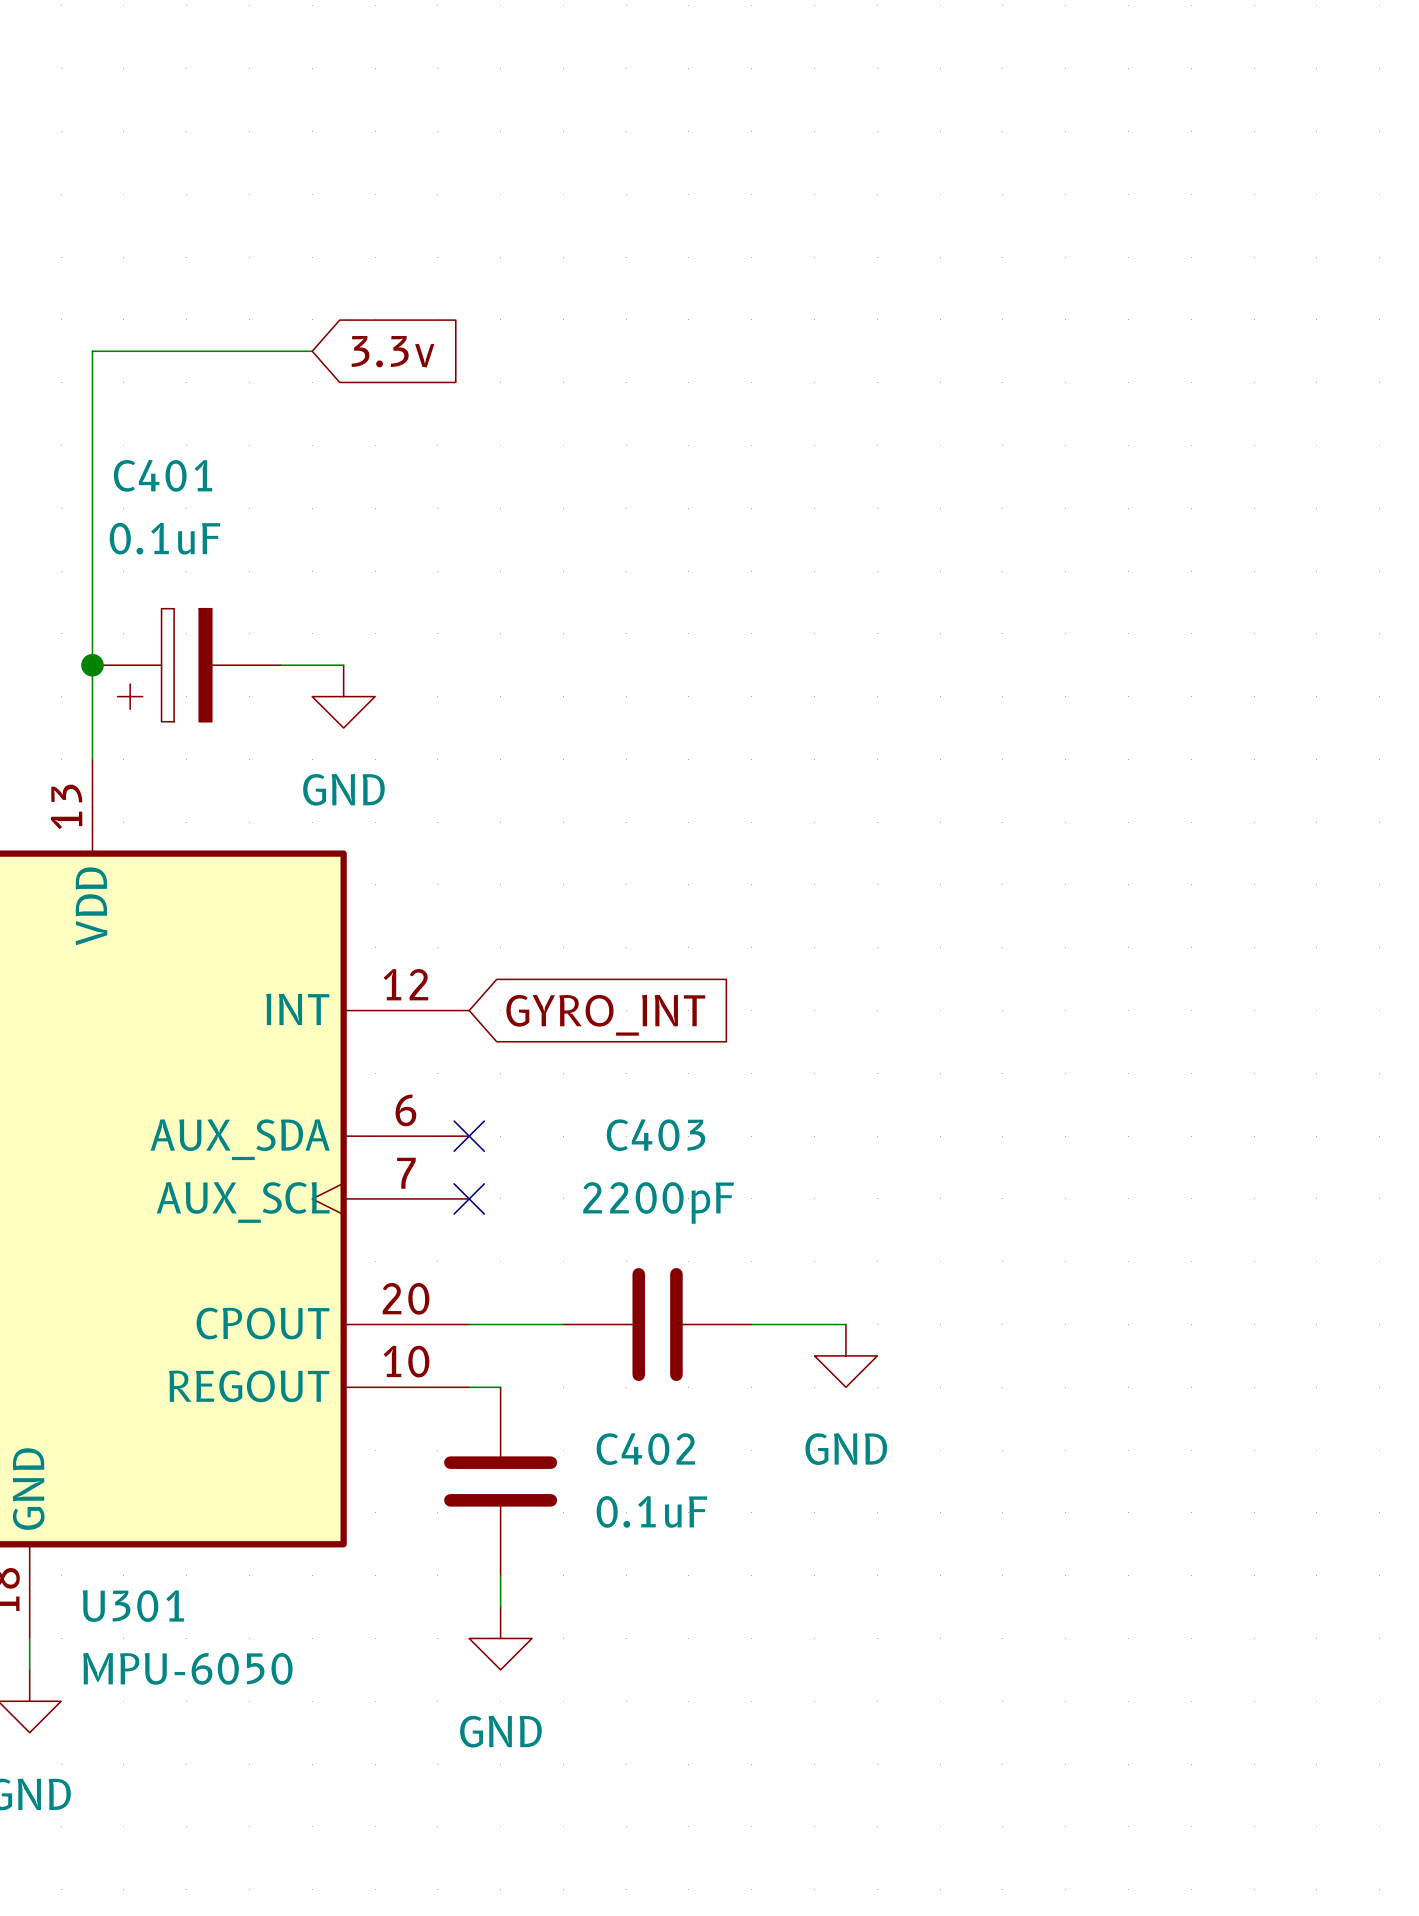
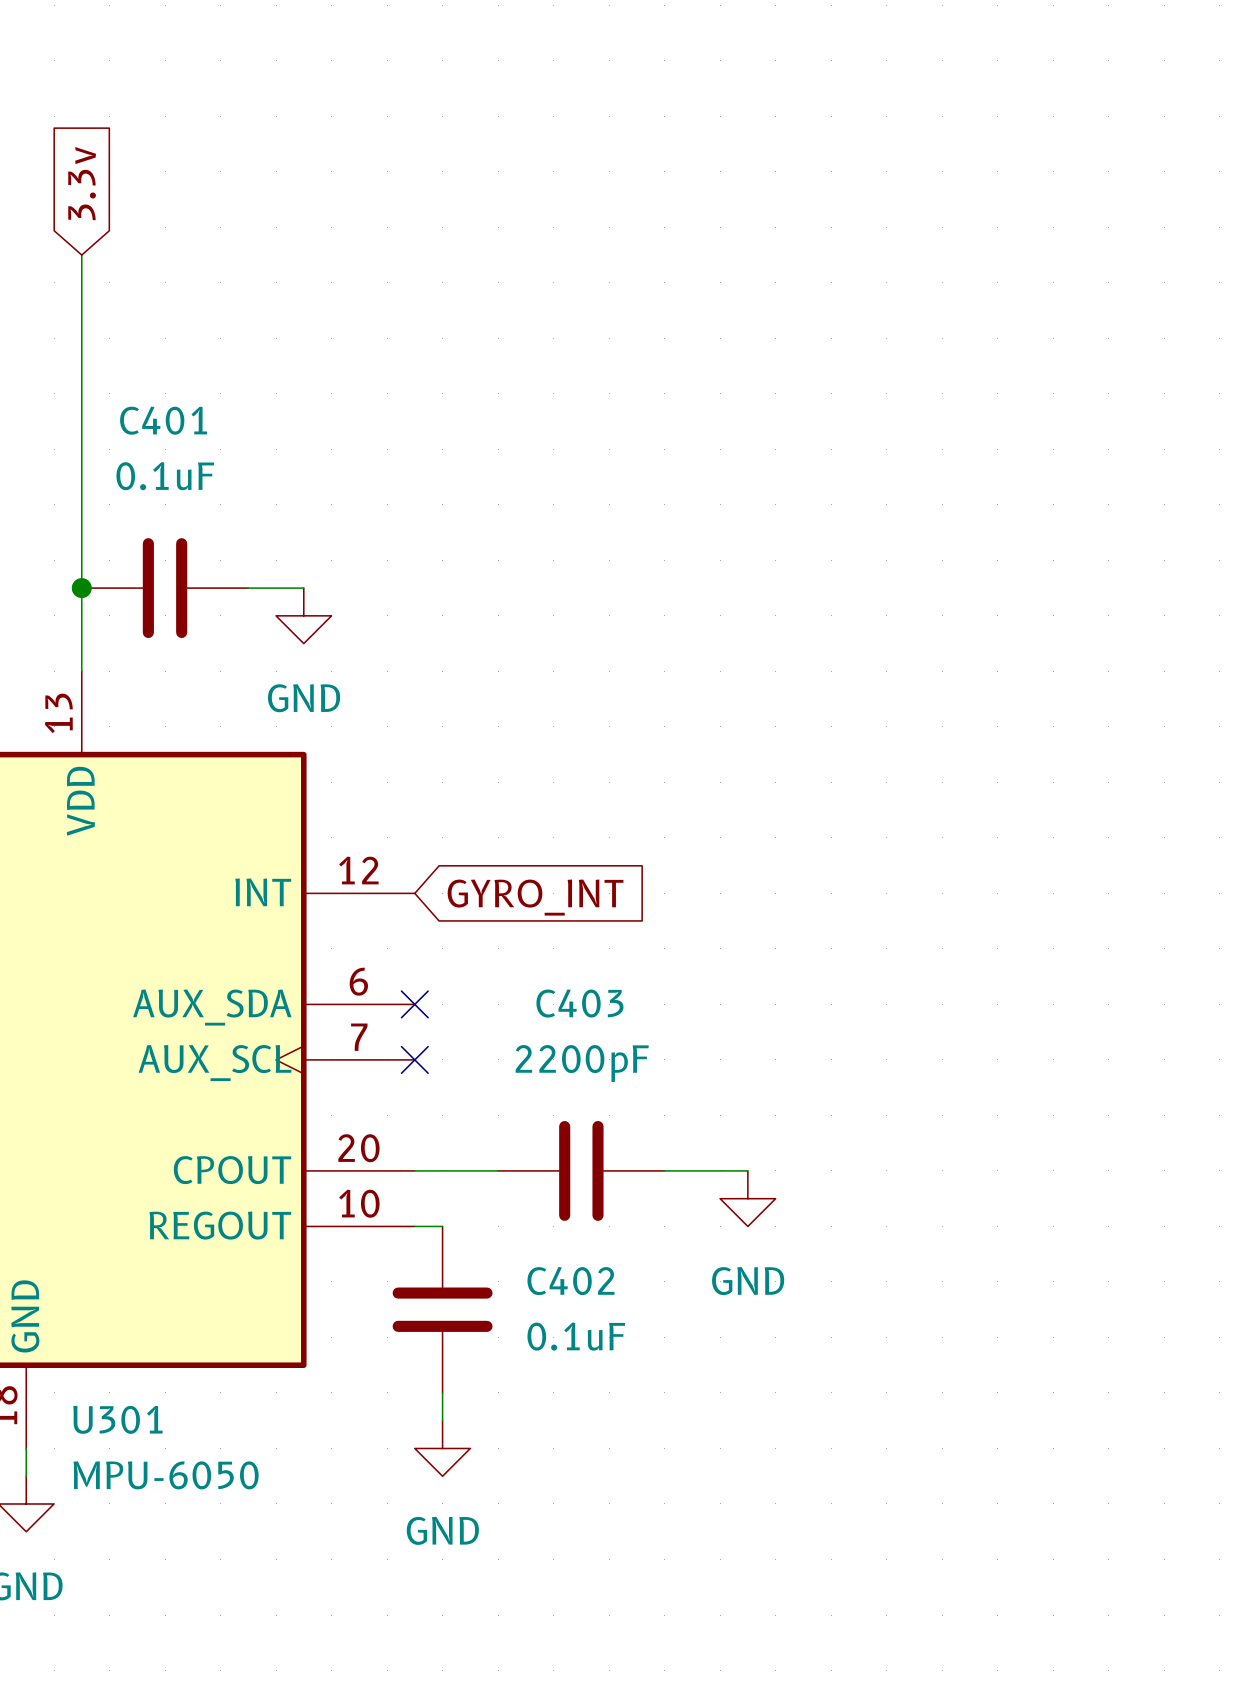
wire: (92, 351) (312, 351) -> (81, 310) (81, 255)
global label rotation: 0° (393, 351) -> 90° counterclockwise (82, 183)
global label position: 3.3v (393, 351) -> 3.3v (82, 183)
C401 symbol: [92, 608, 281, 722] -> [81, 538, 249, 639]

